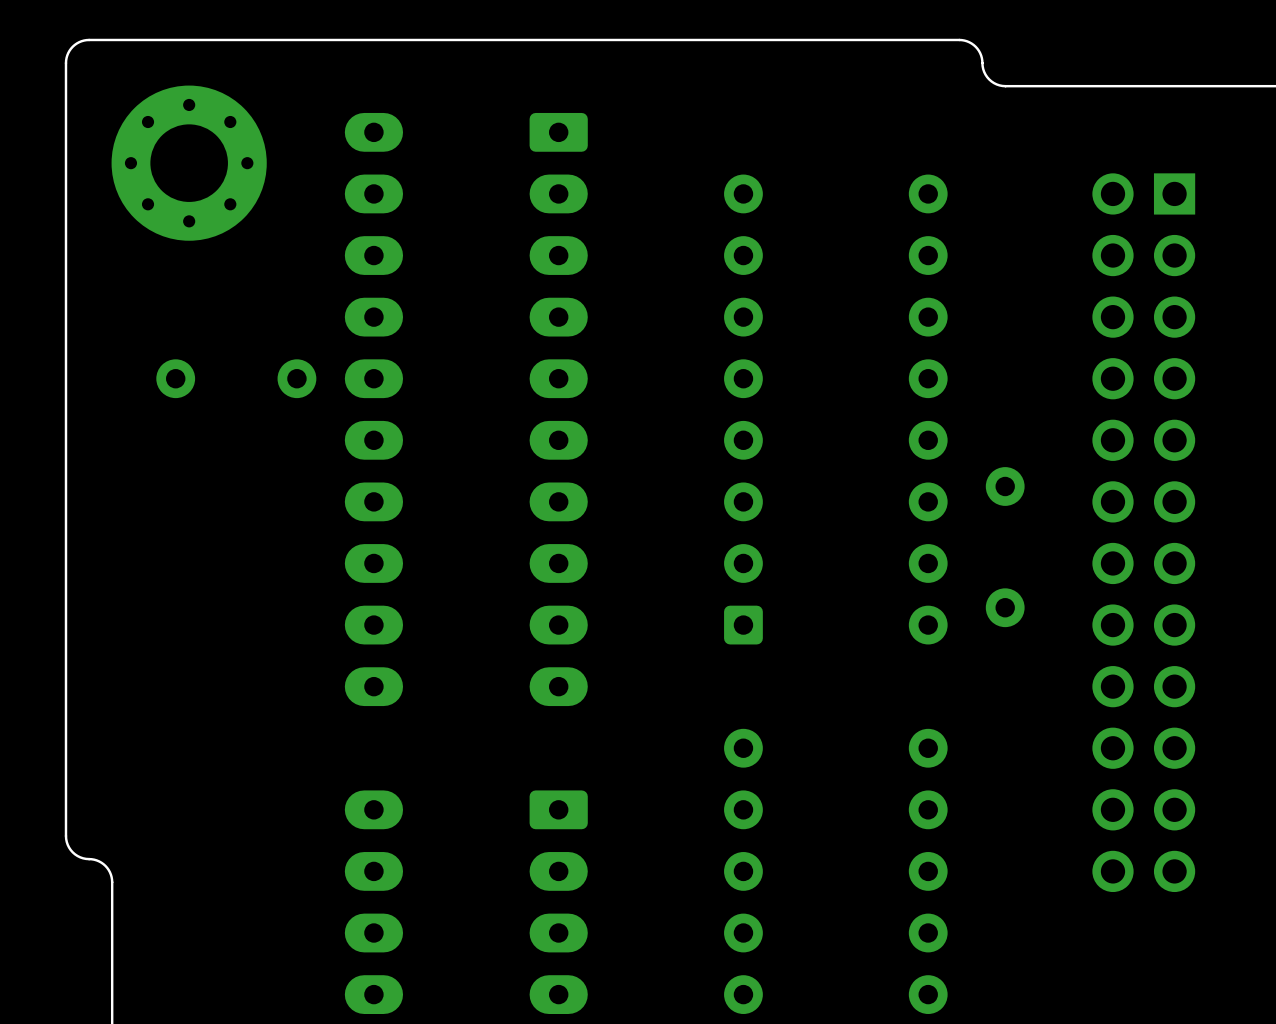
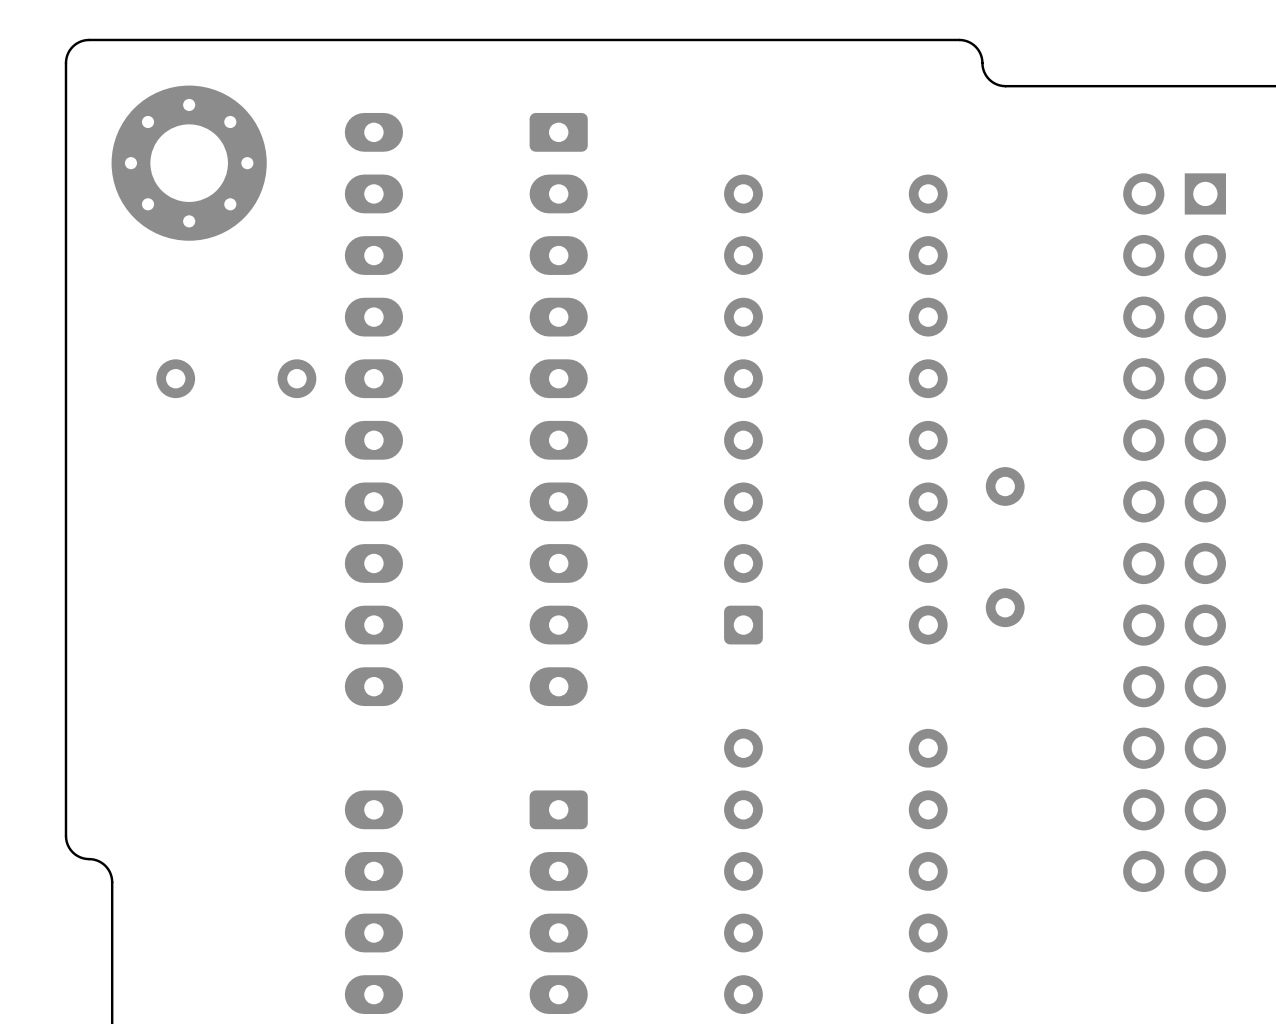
part position: (1143, 532) -> (1174, 532)

